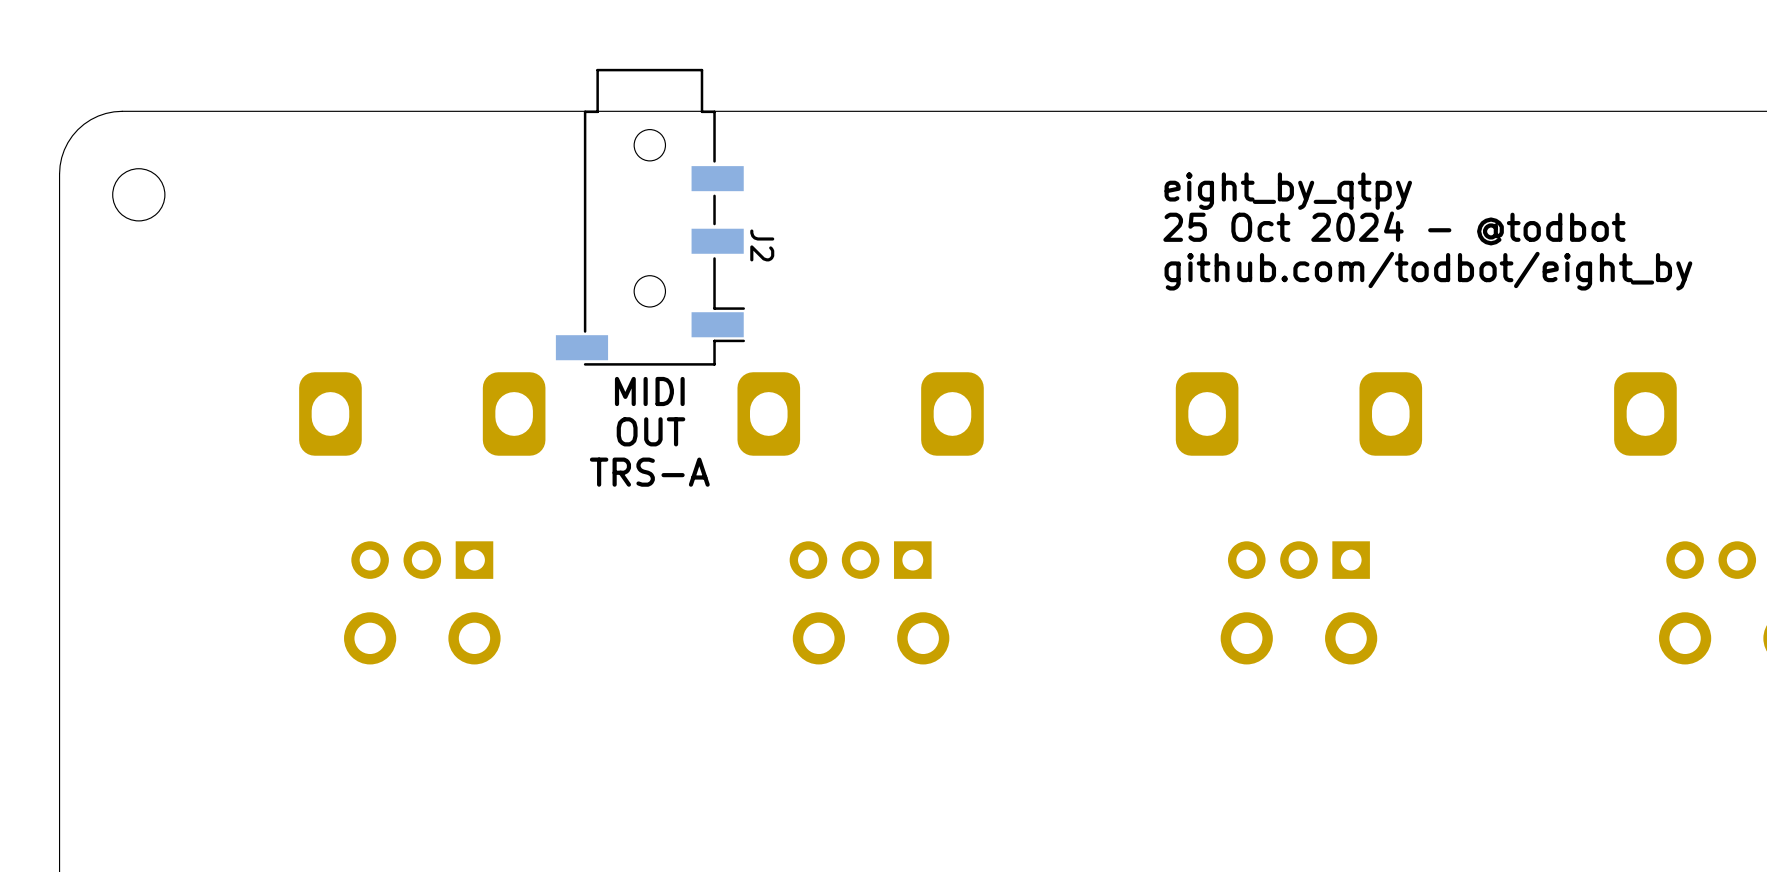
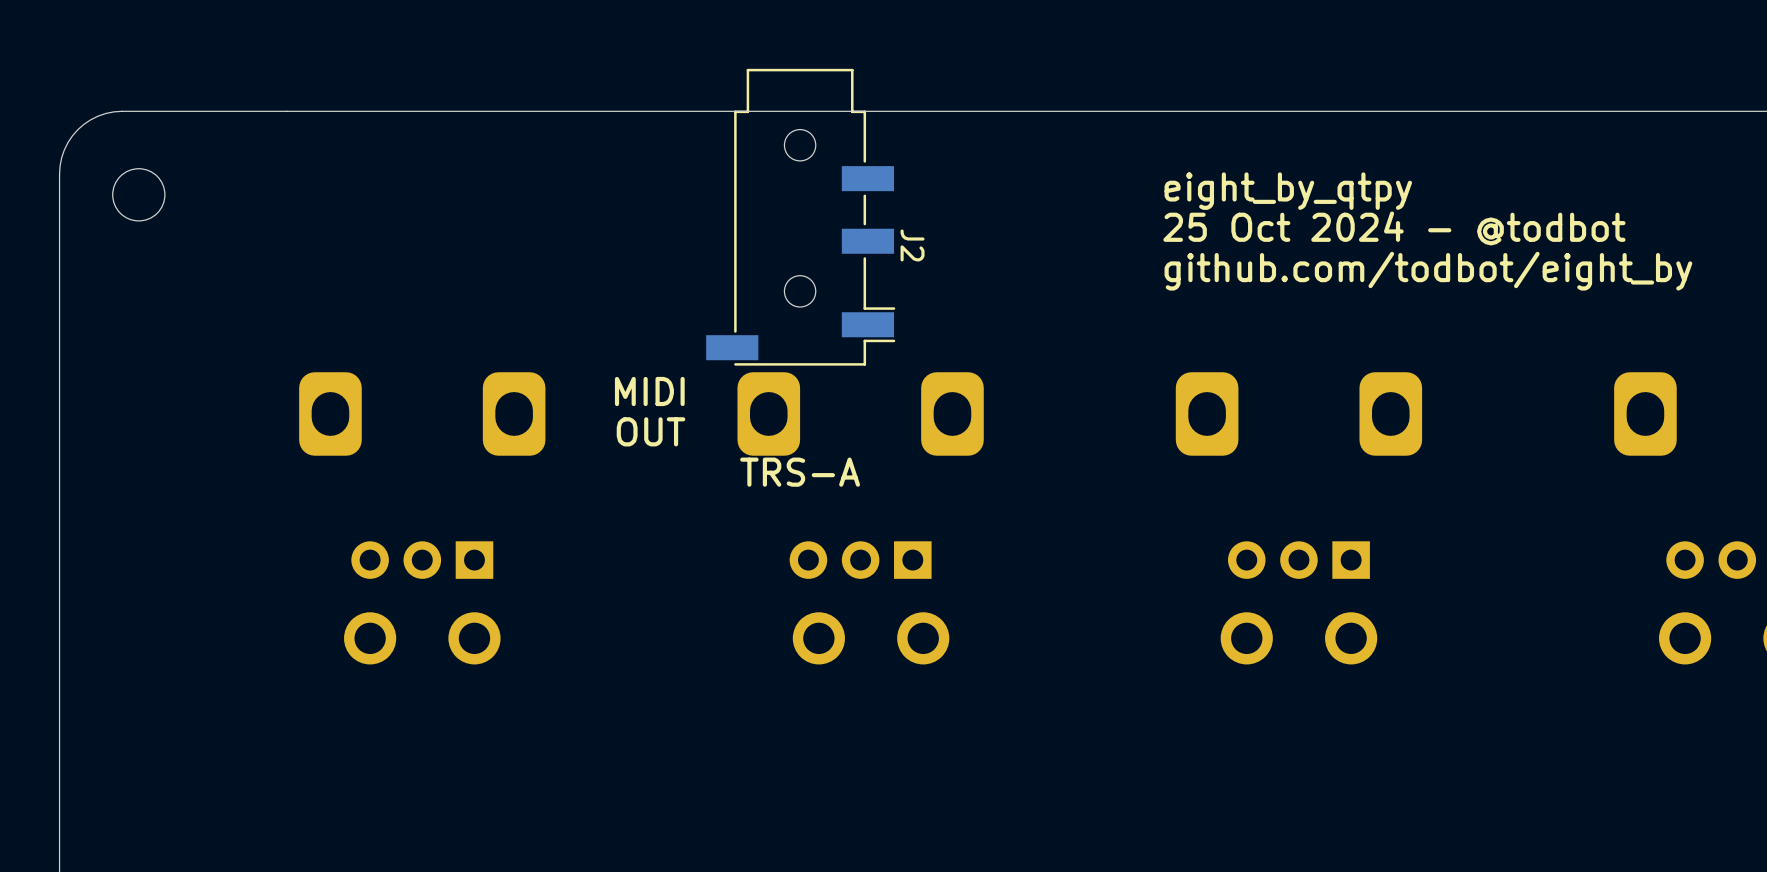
J2 position: (650, 217) -> (800, 217)
text position: TRS-A (649, 472) -> TRS-A (800, 472)

